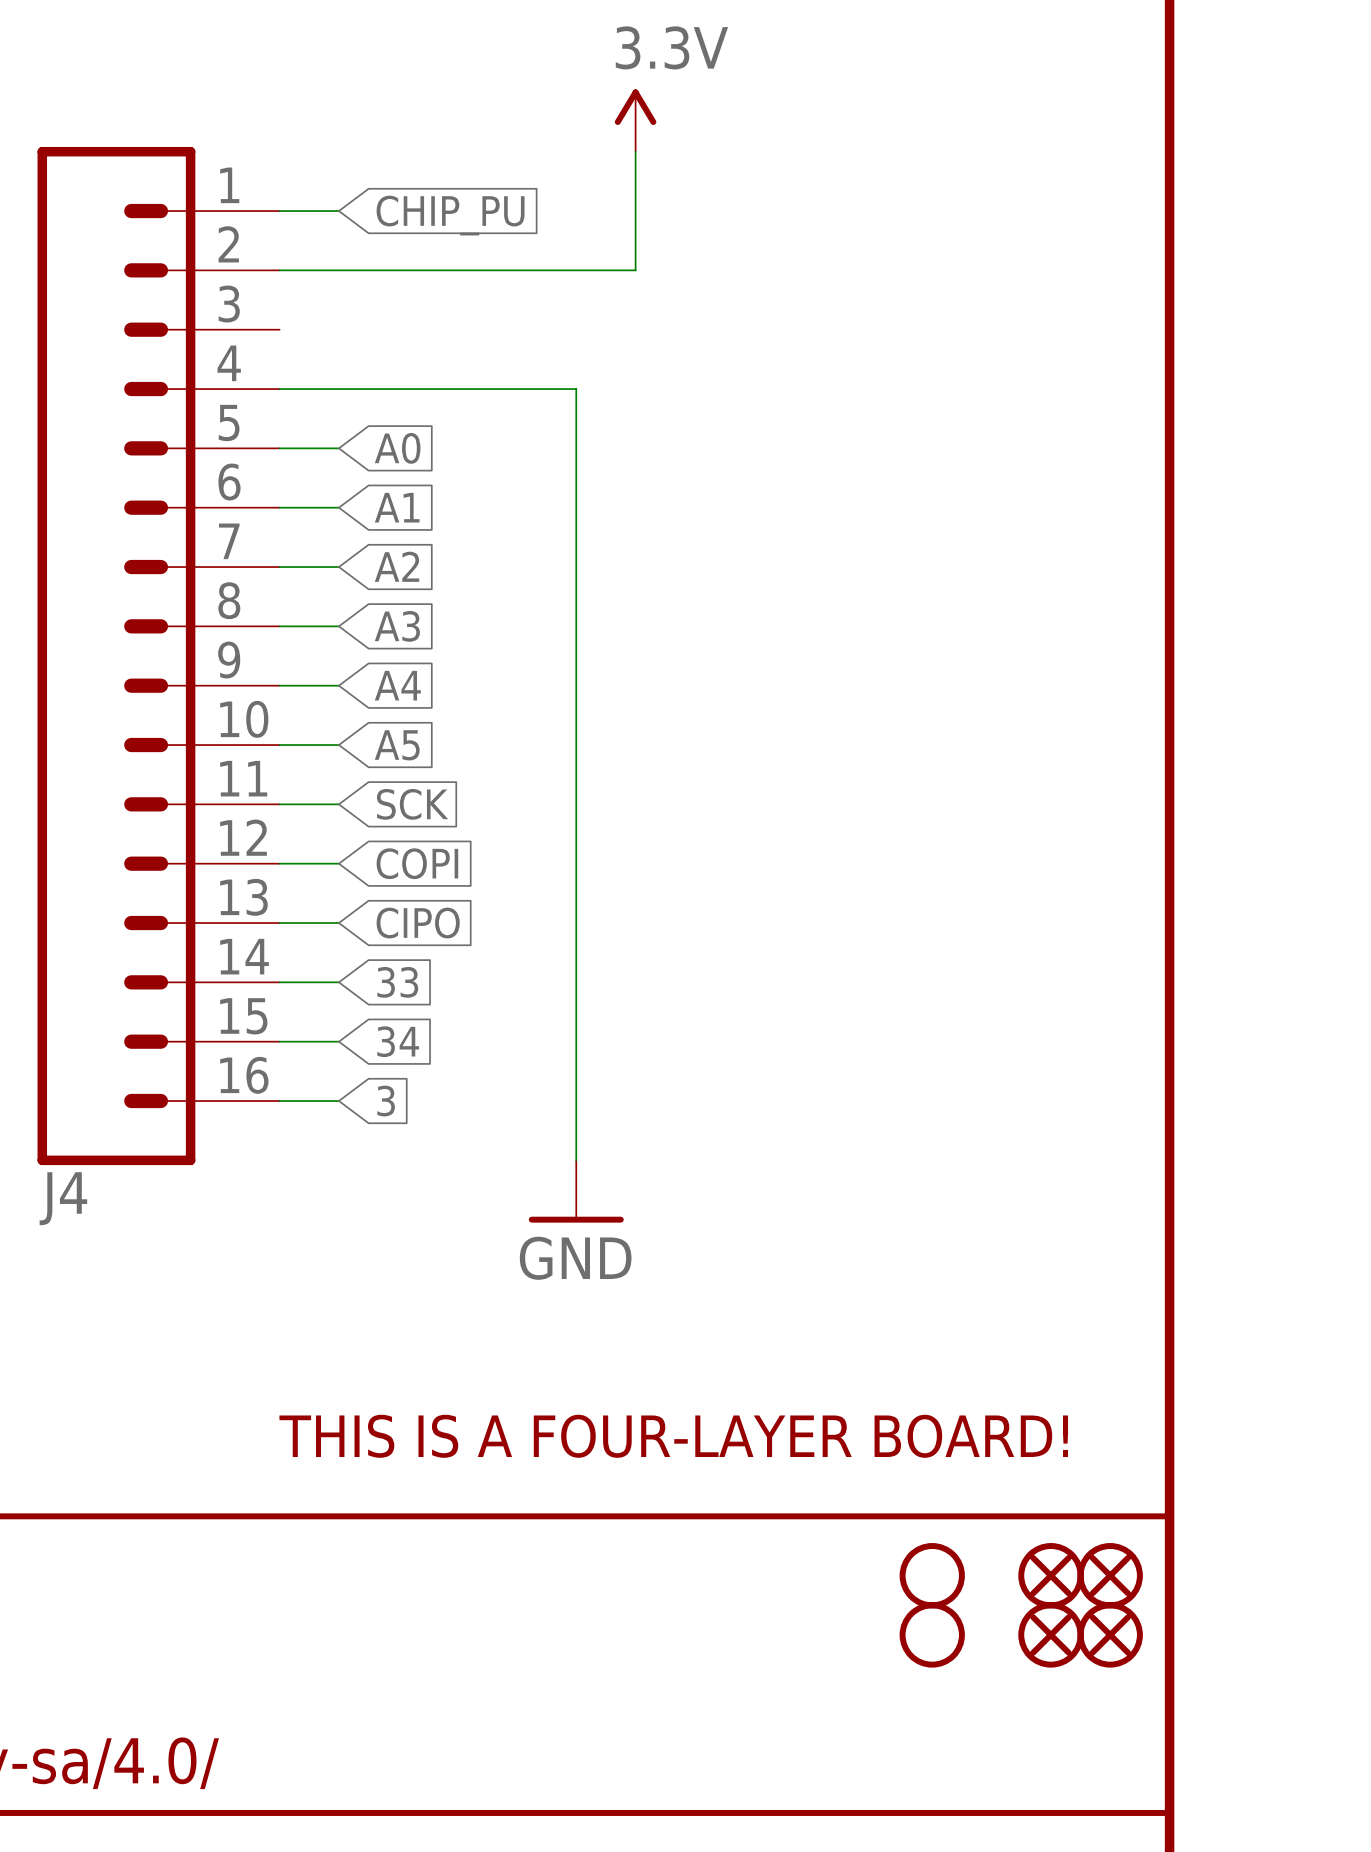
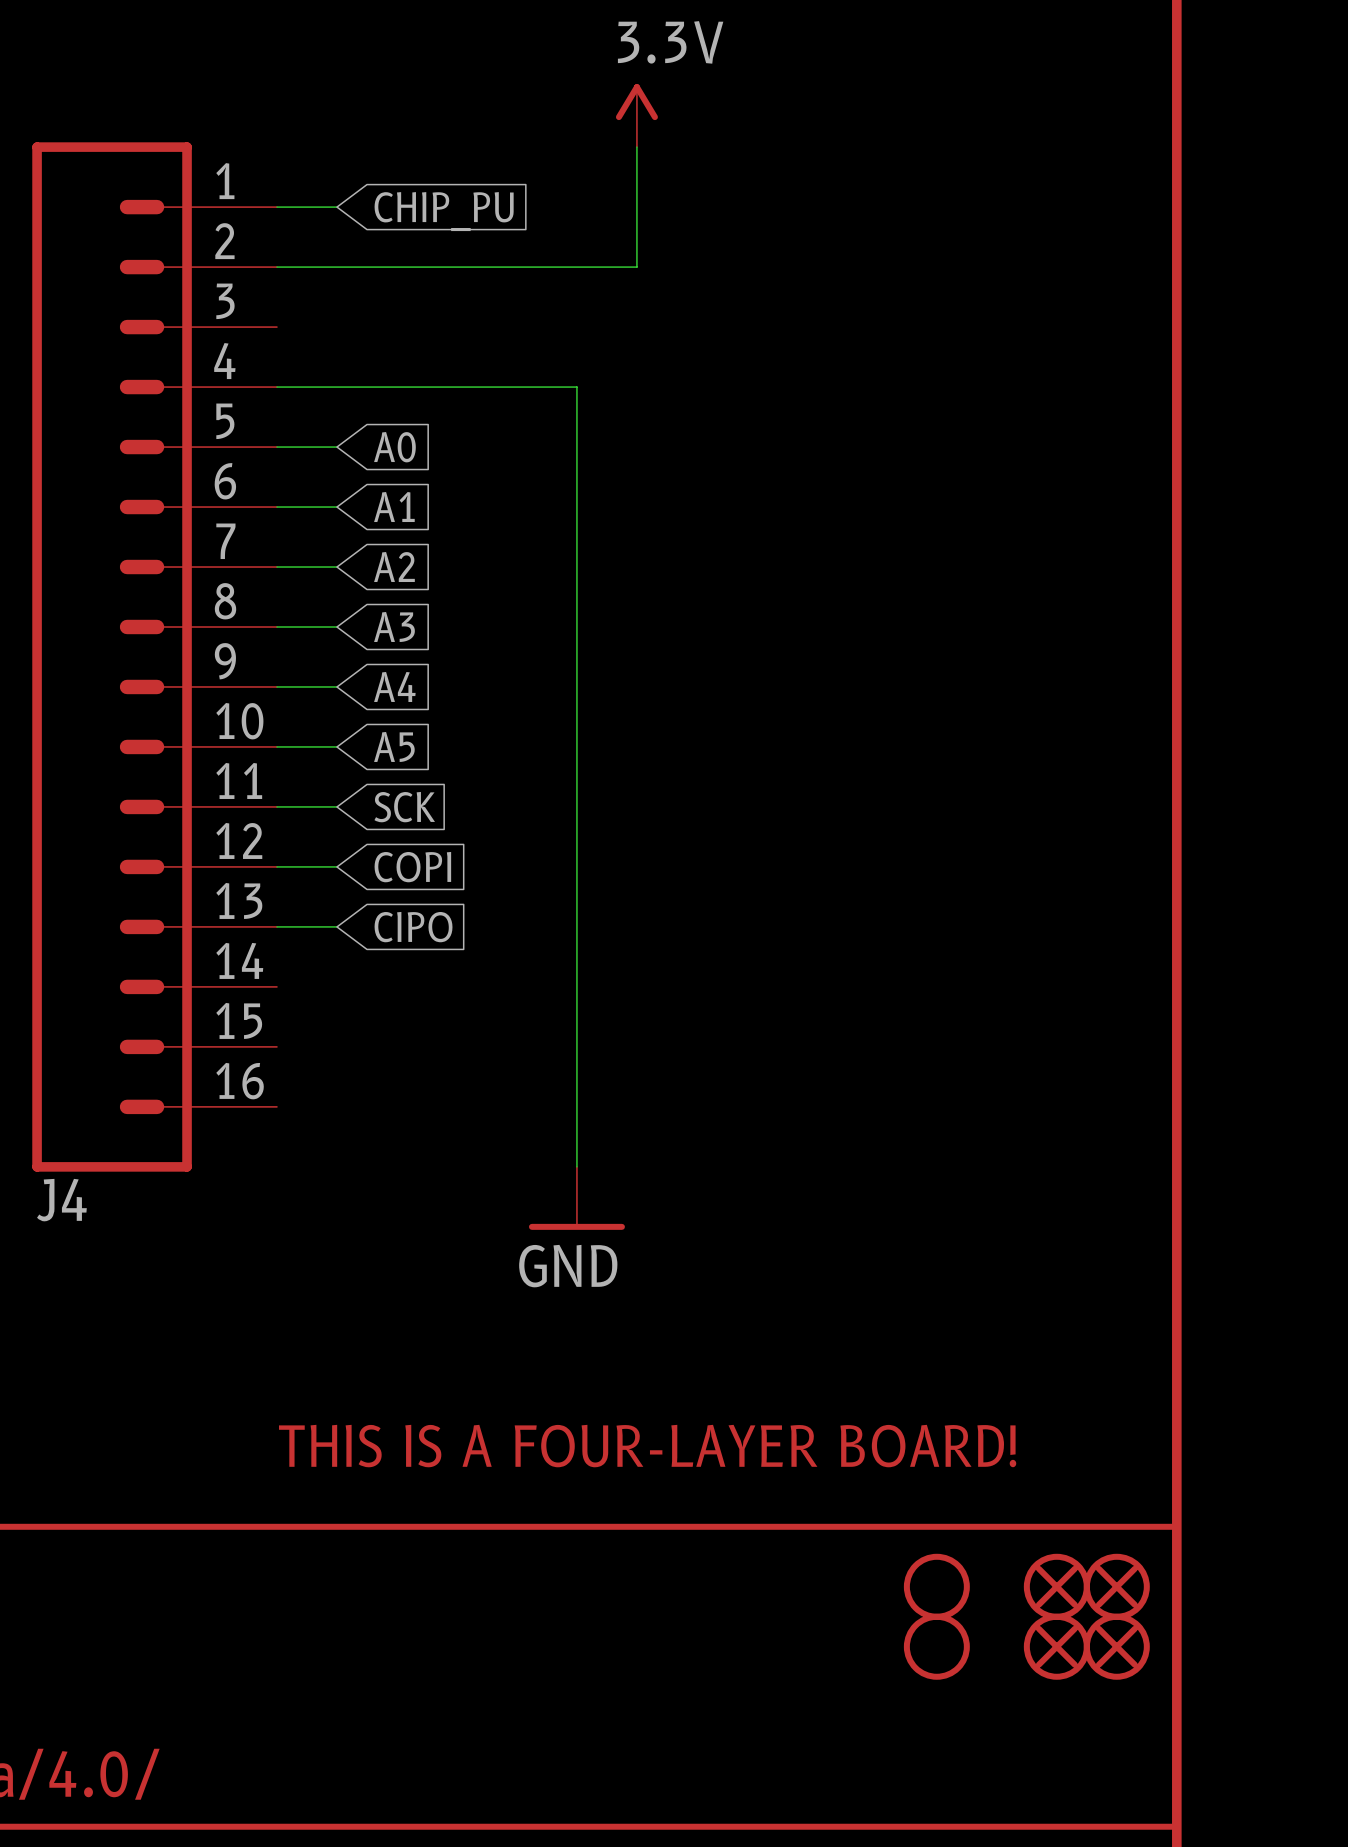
wire: (279, 982) (338, 982) -> none
global label: 33 (397, 982) -> none
wire: (279, 1041) (338, 1041) -> none
global label: 34 (398, 1041) -> none
wire: (279, 1101) (338, 1101) -> none
global label: 3 (386, 1101) -> none

